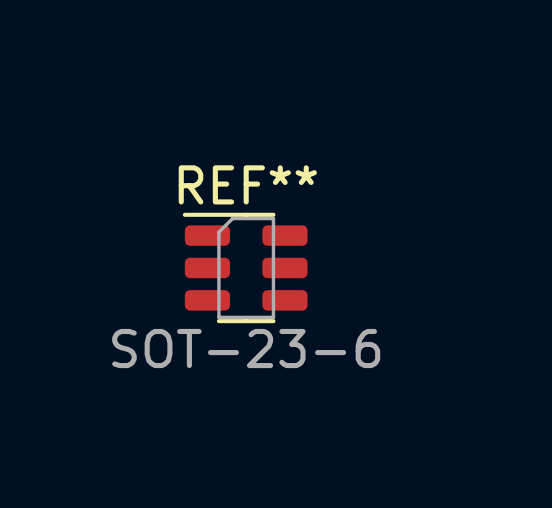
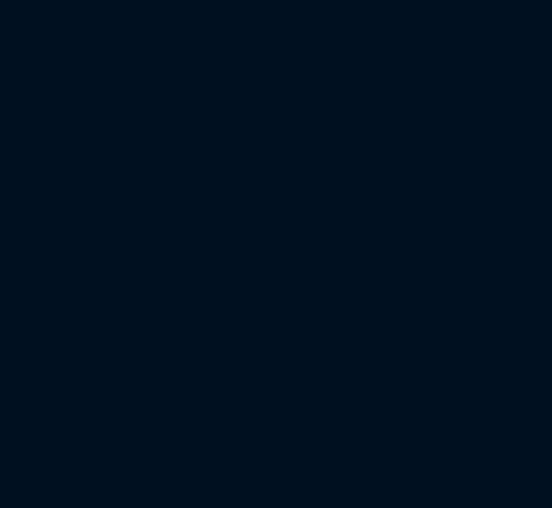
REF**: SOT-23-6 (245, 267) -> none

